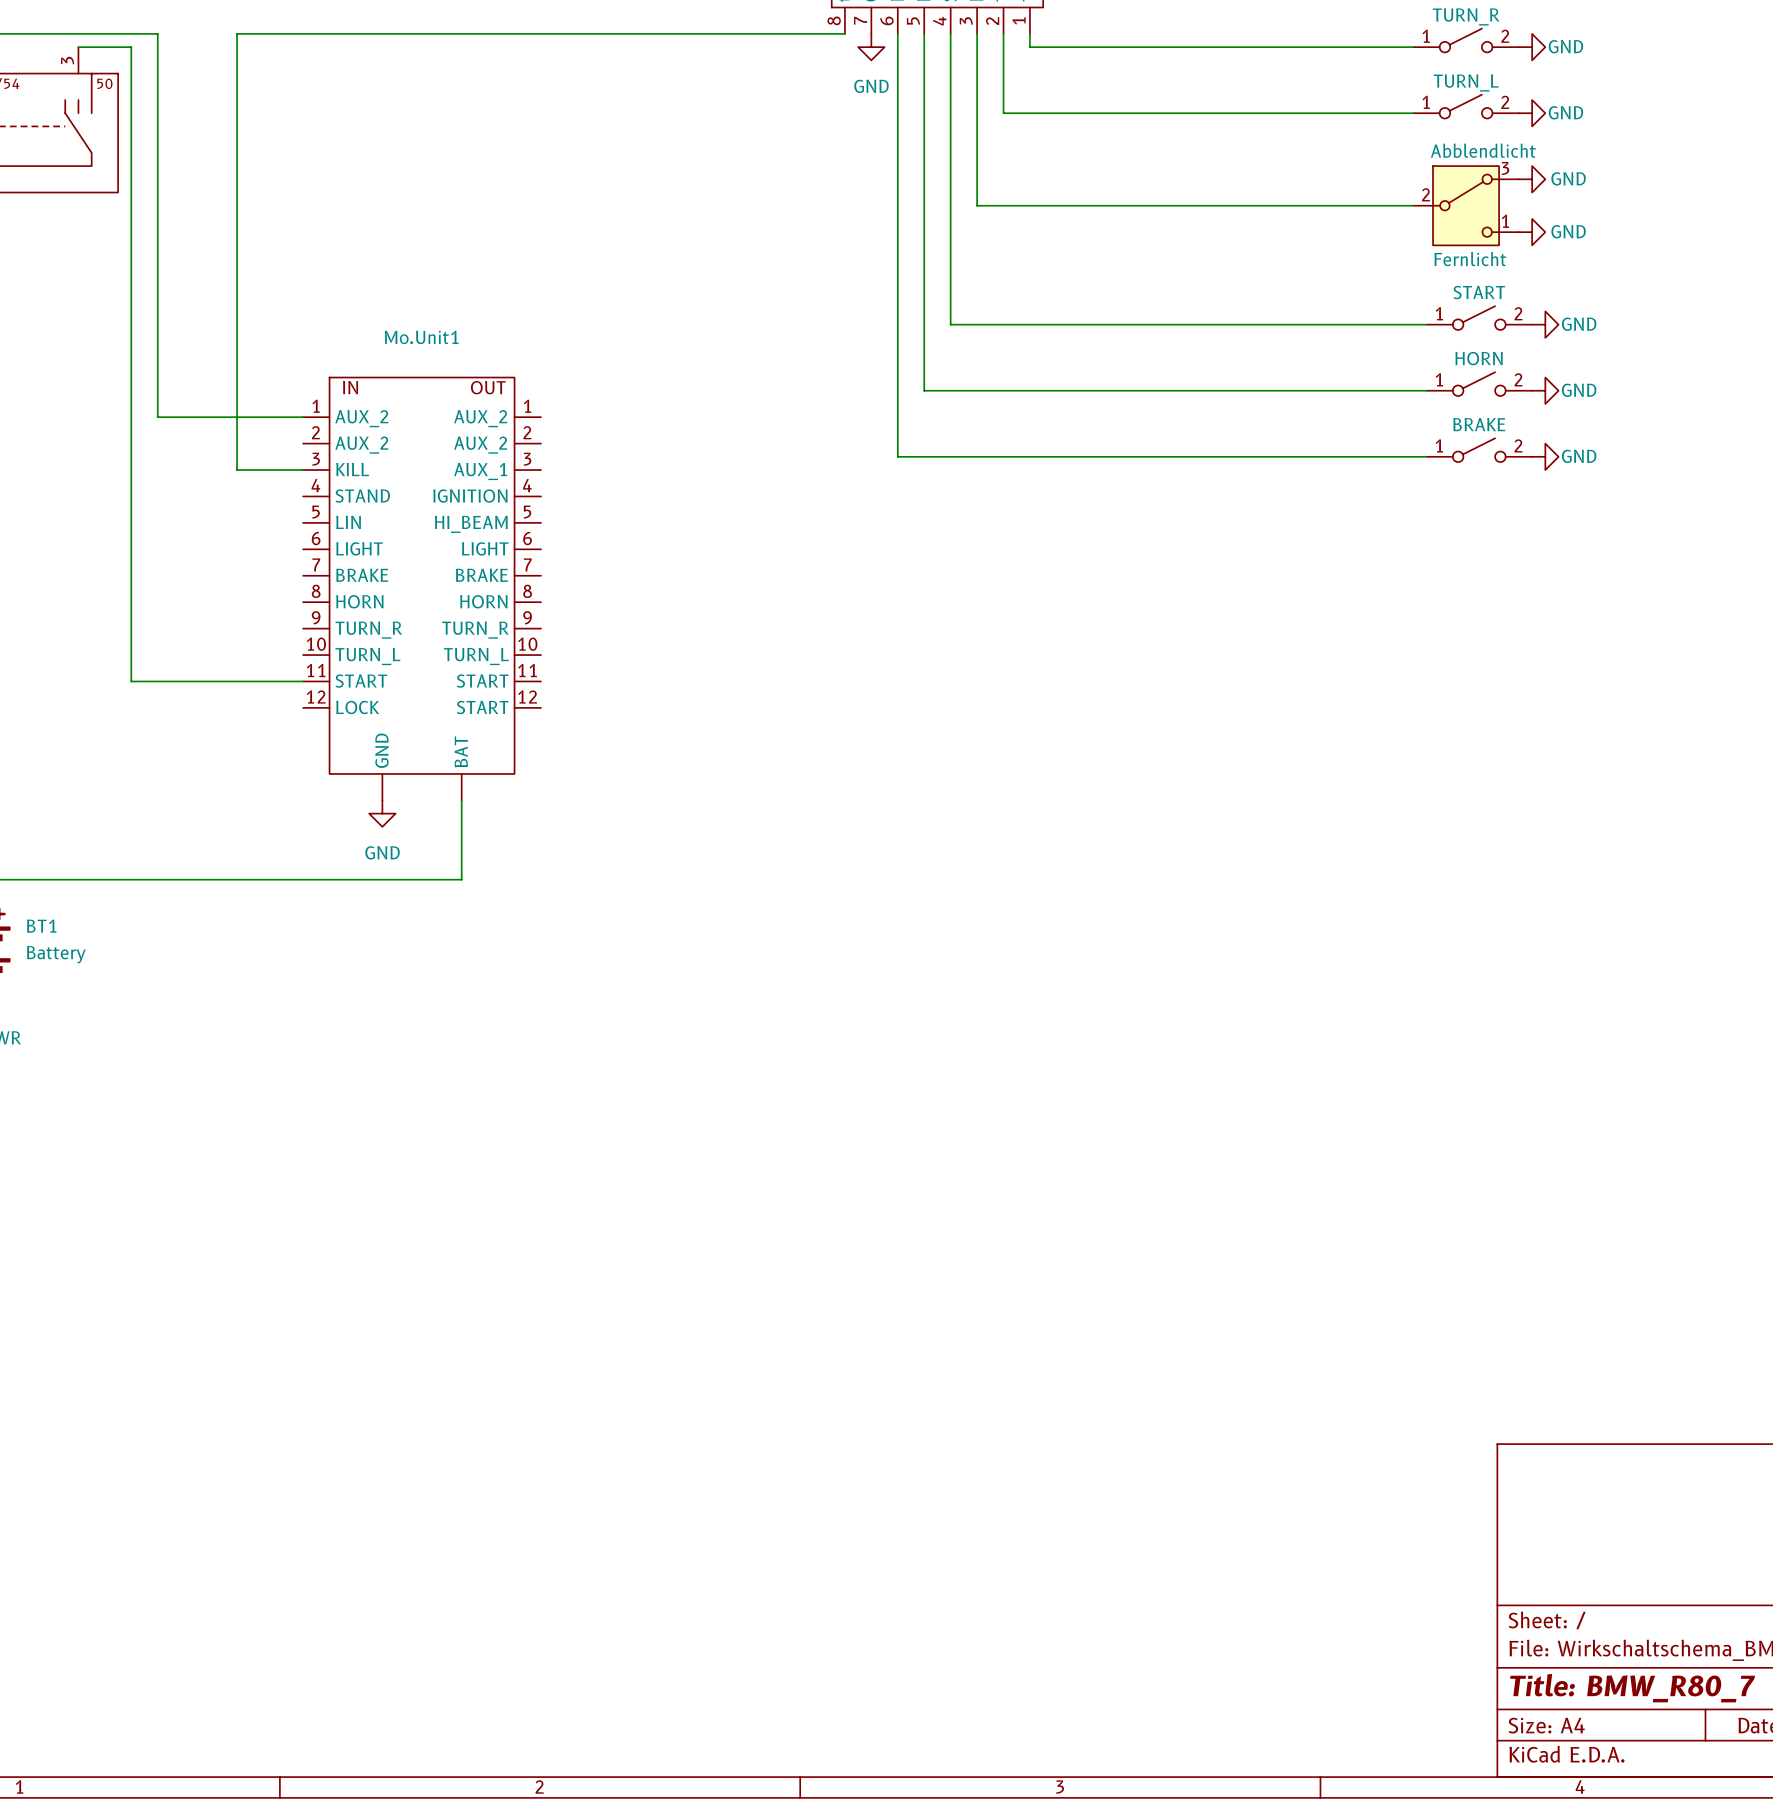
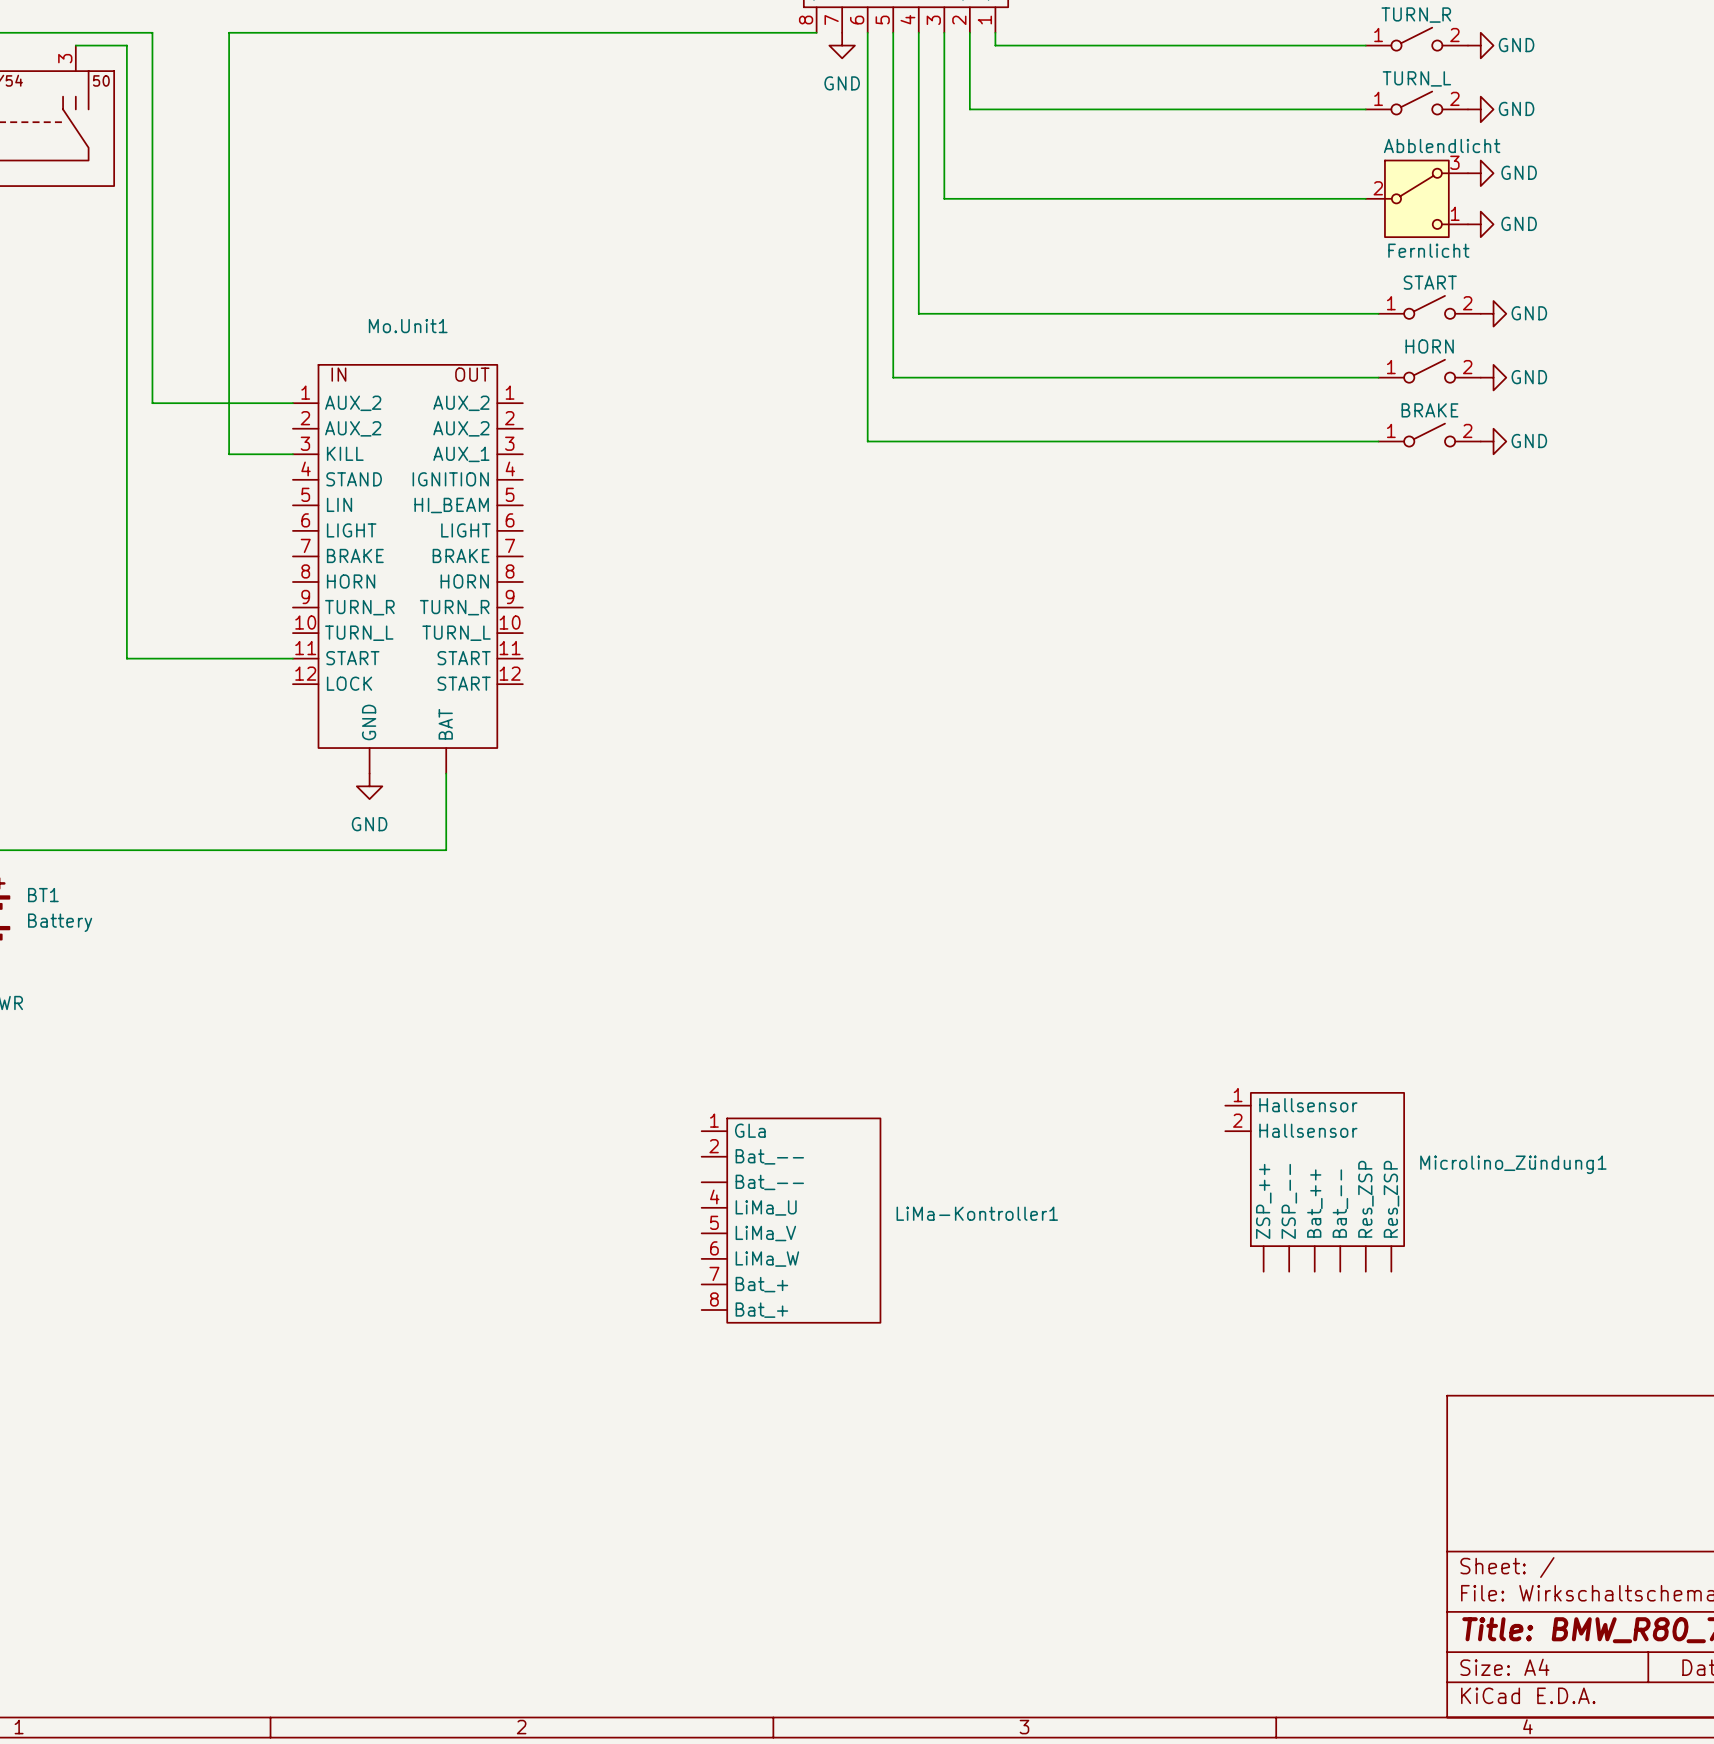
Microlino_Zündung1: none -> (1314, 1182)
LiMa-Kontroller1: none -> (791, 1220)

